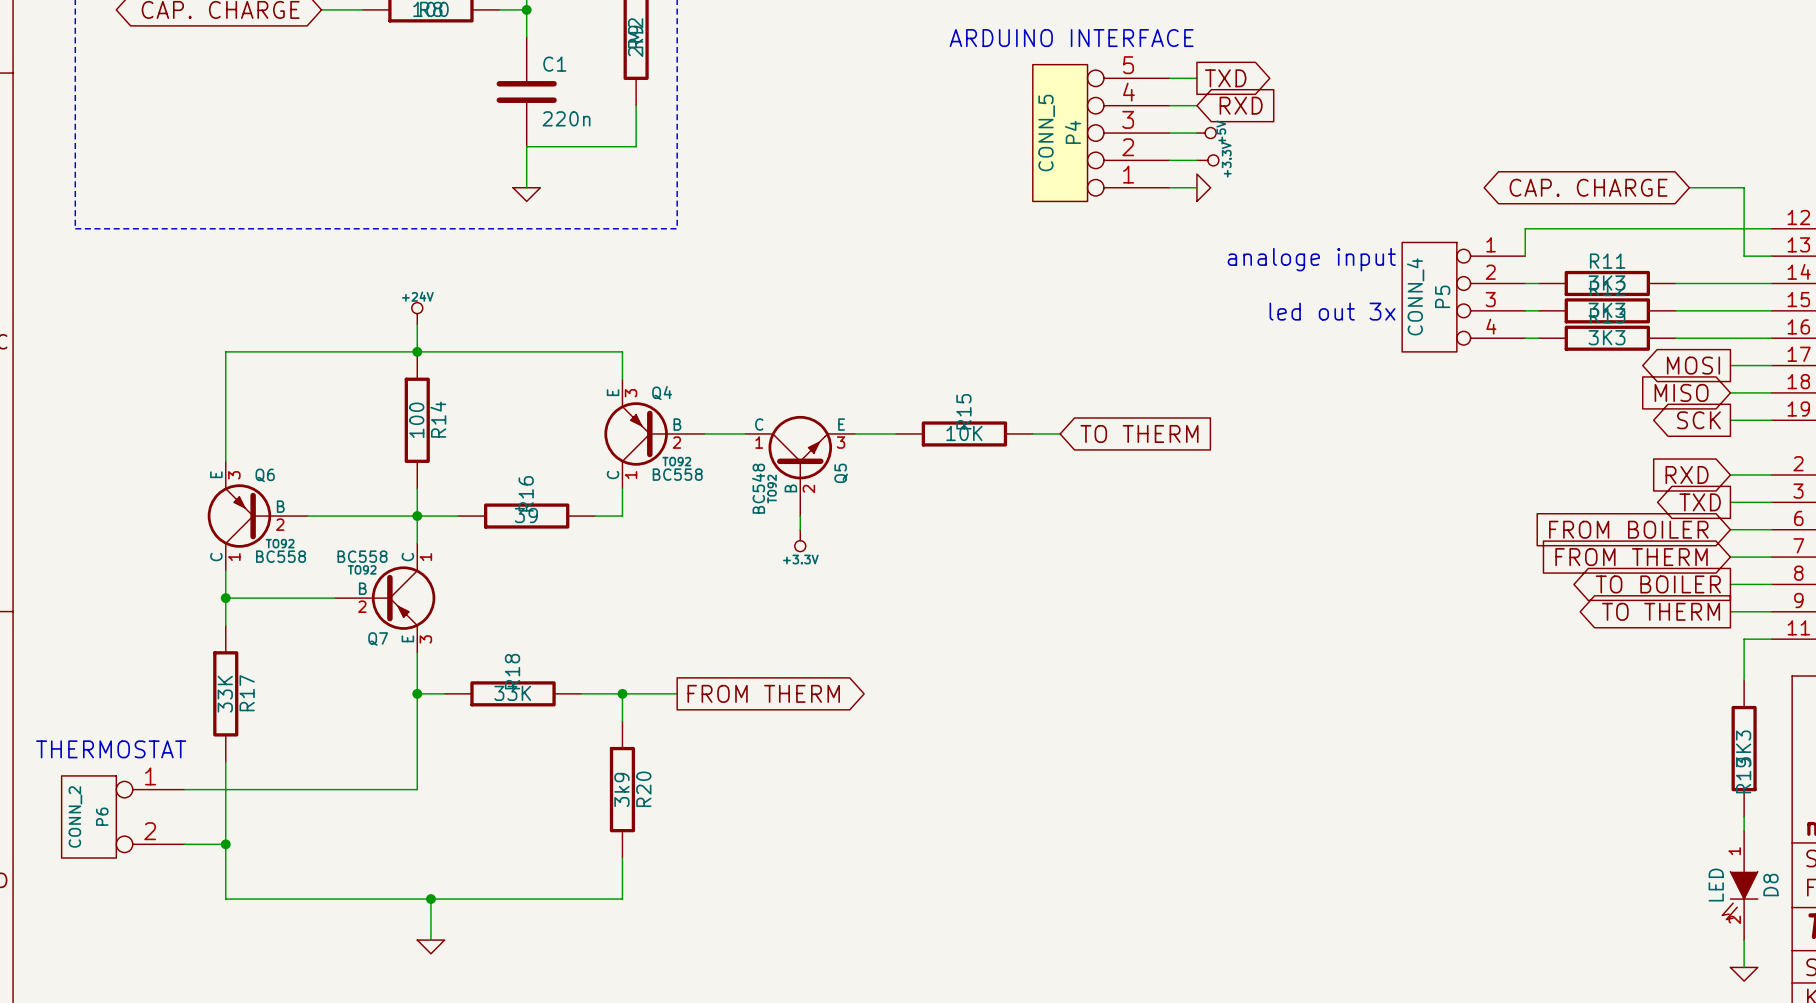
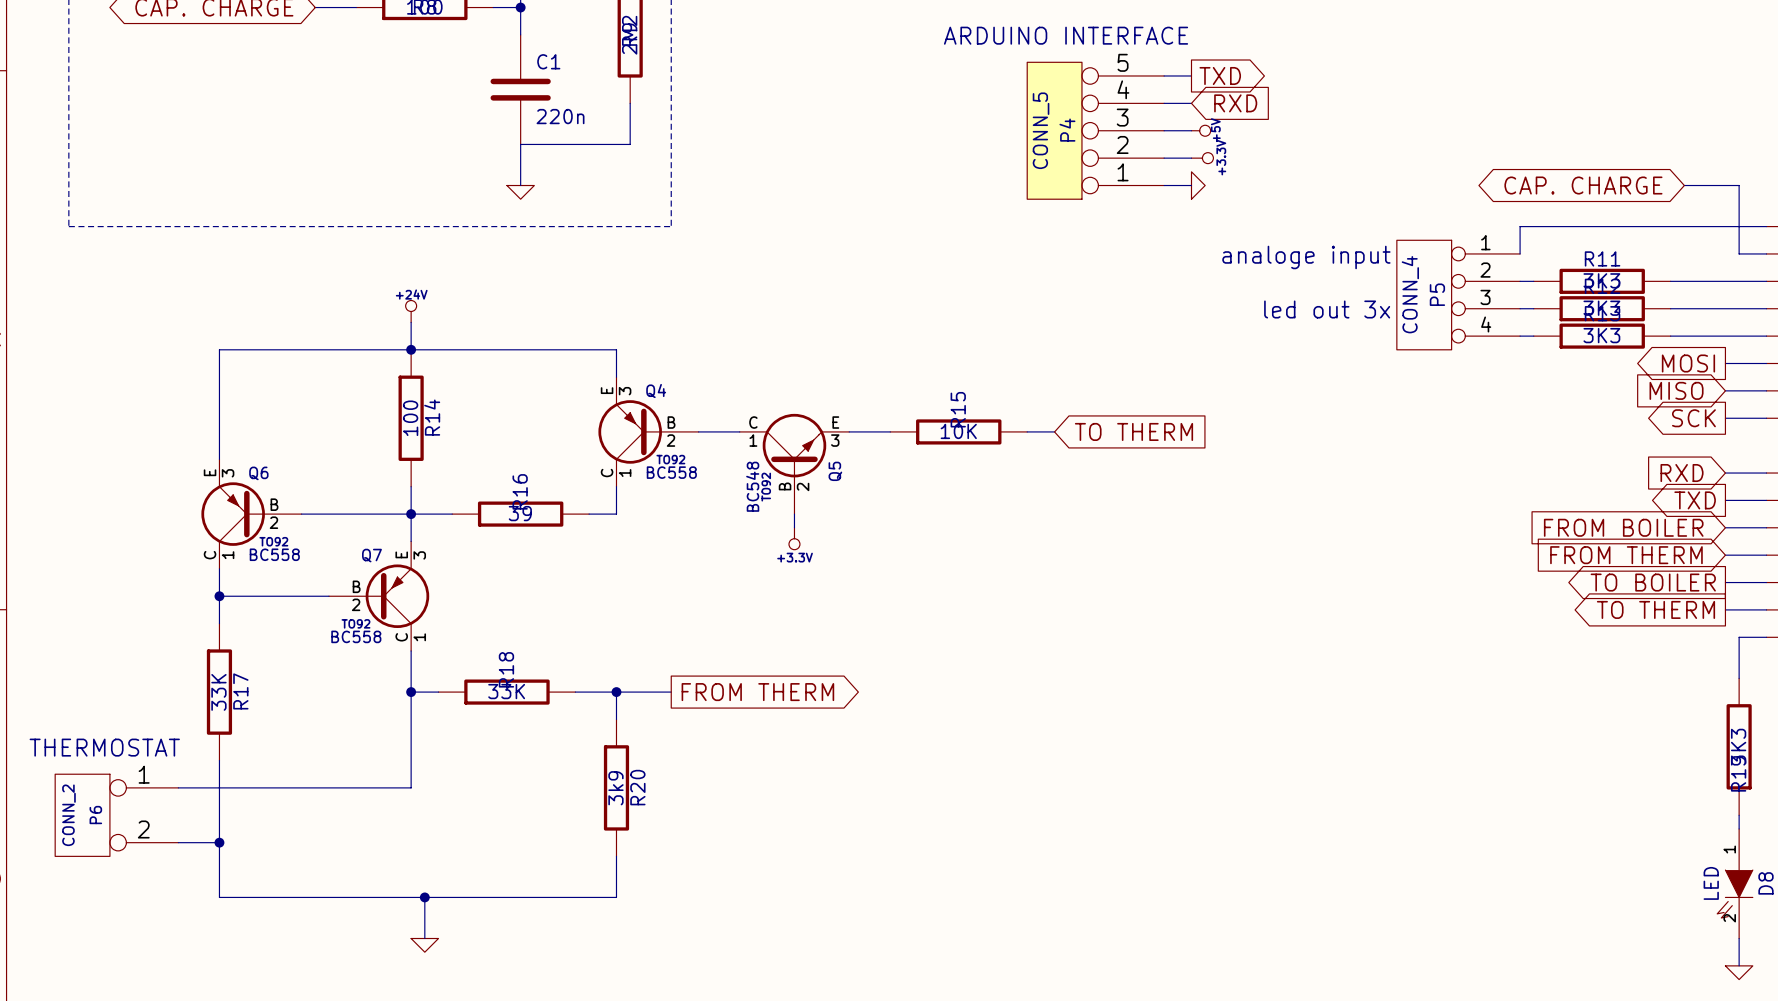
Q7 flip: as is (403, 598) -> up-down (397, 596)

